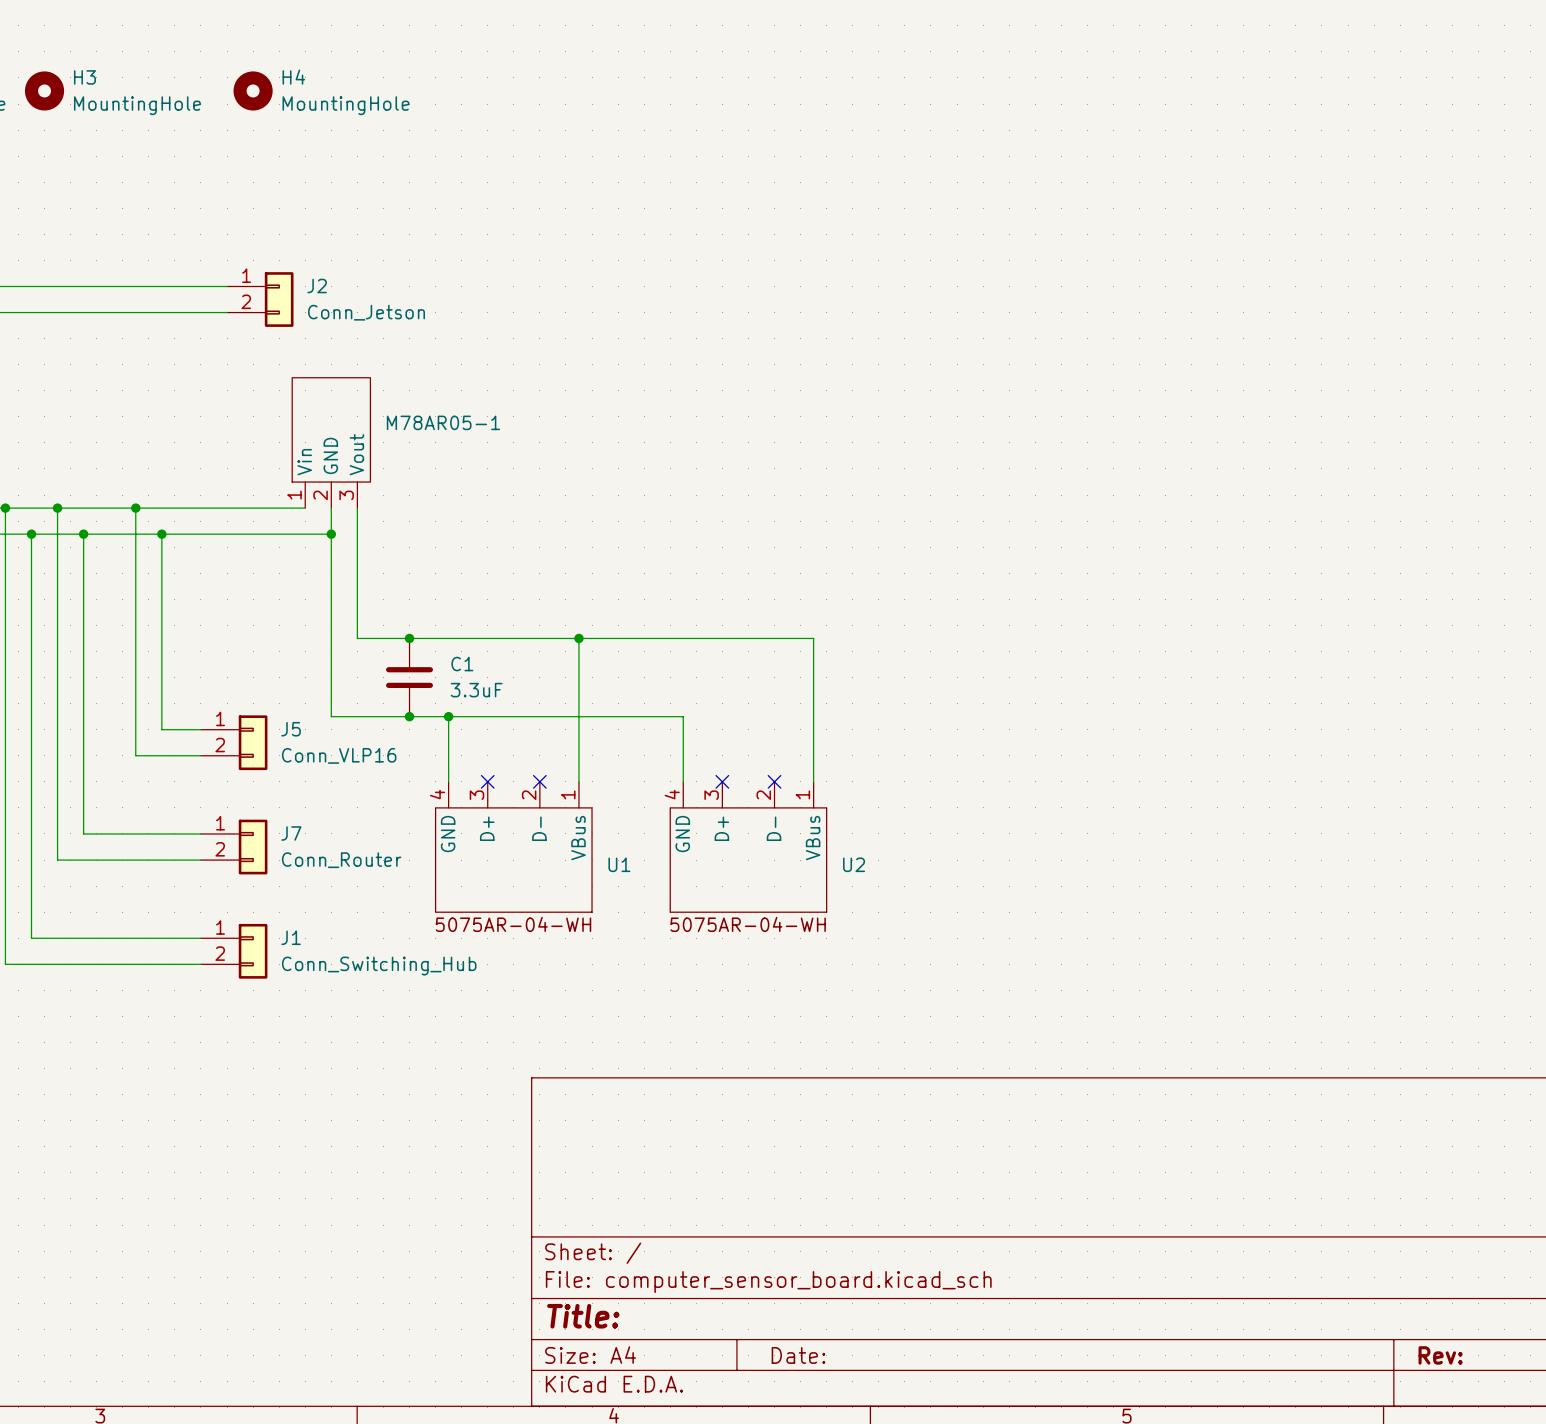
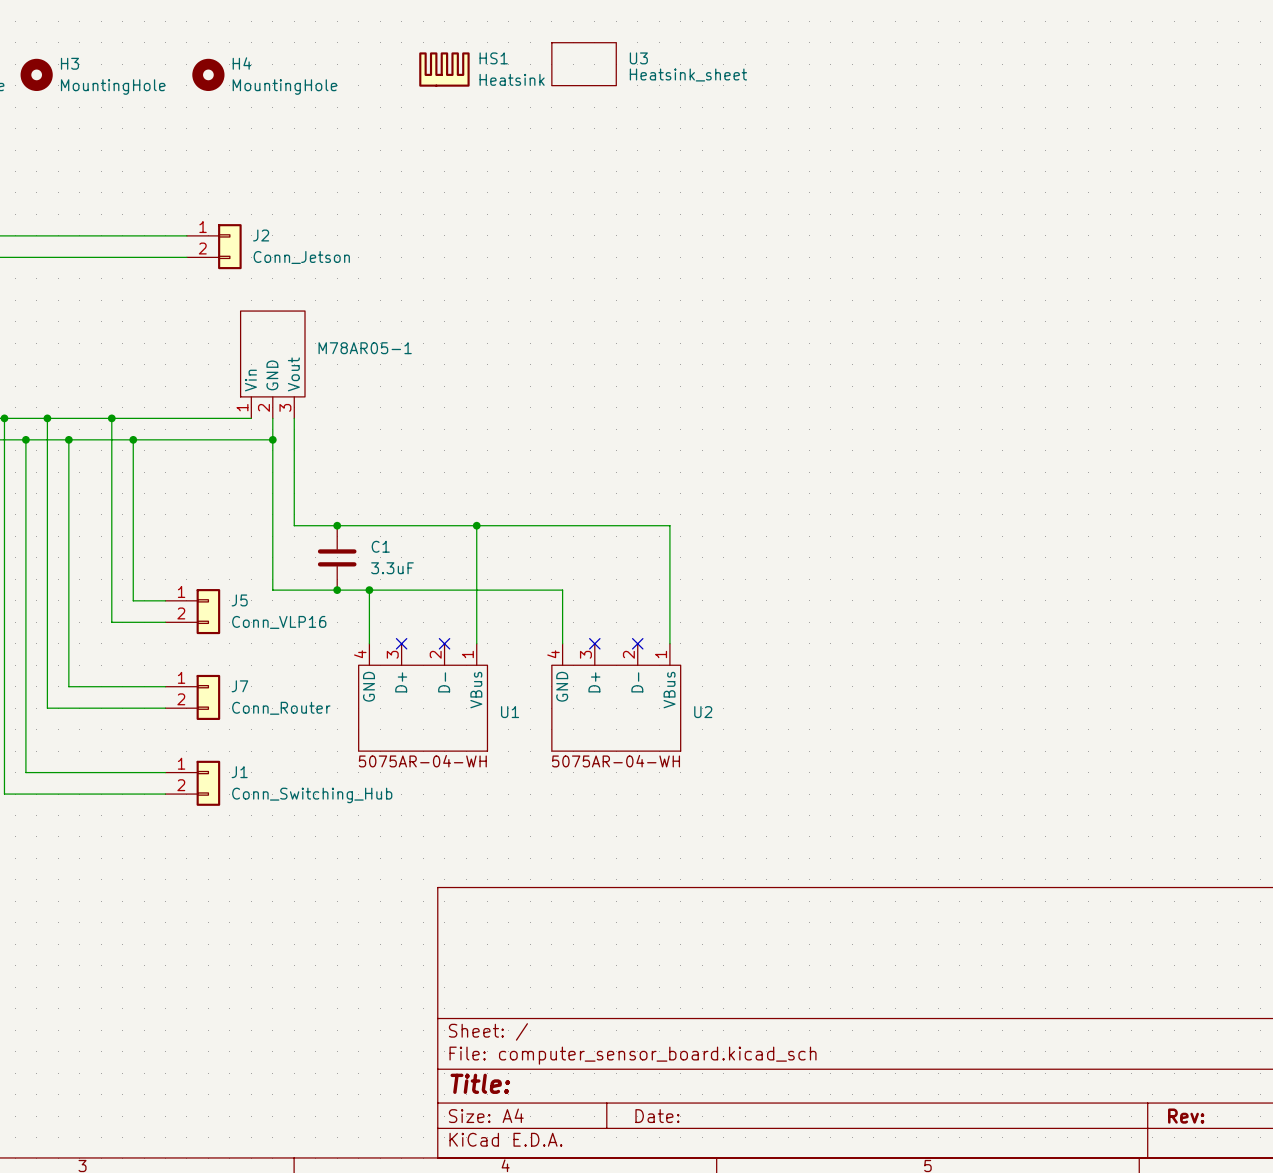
U3: none -> Heatsink_sheet (584, 64)
HS1: none -> Heatsink (444, 69)

